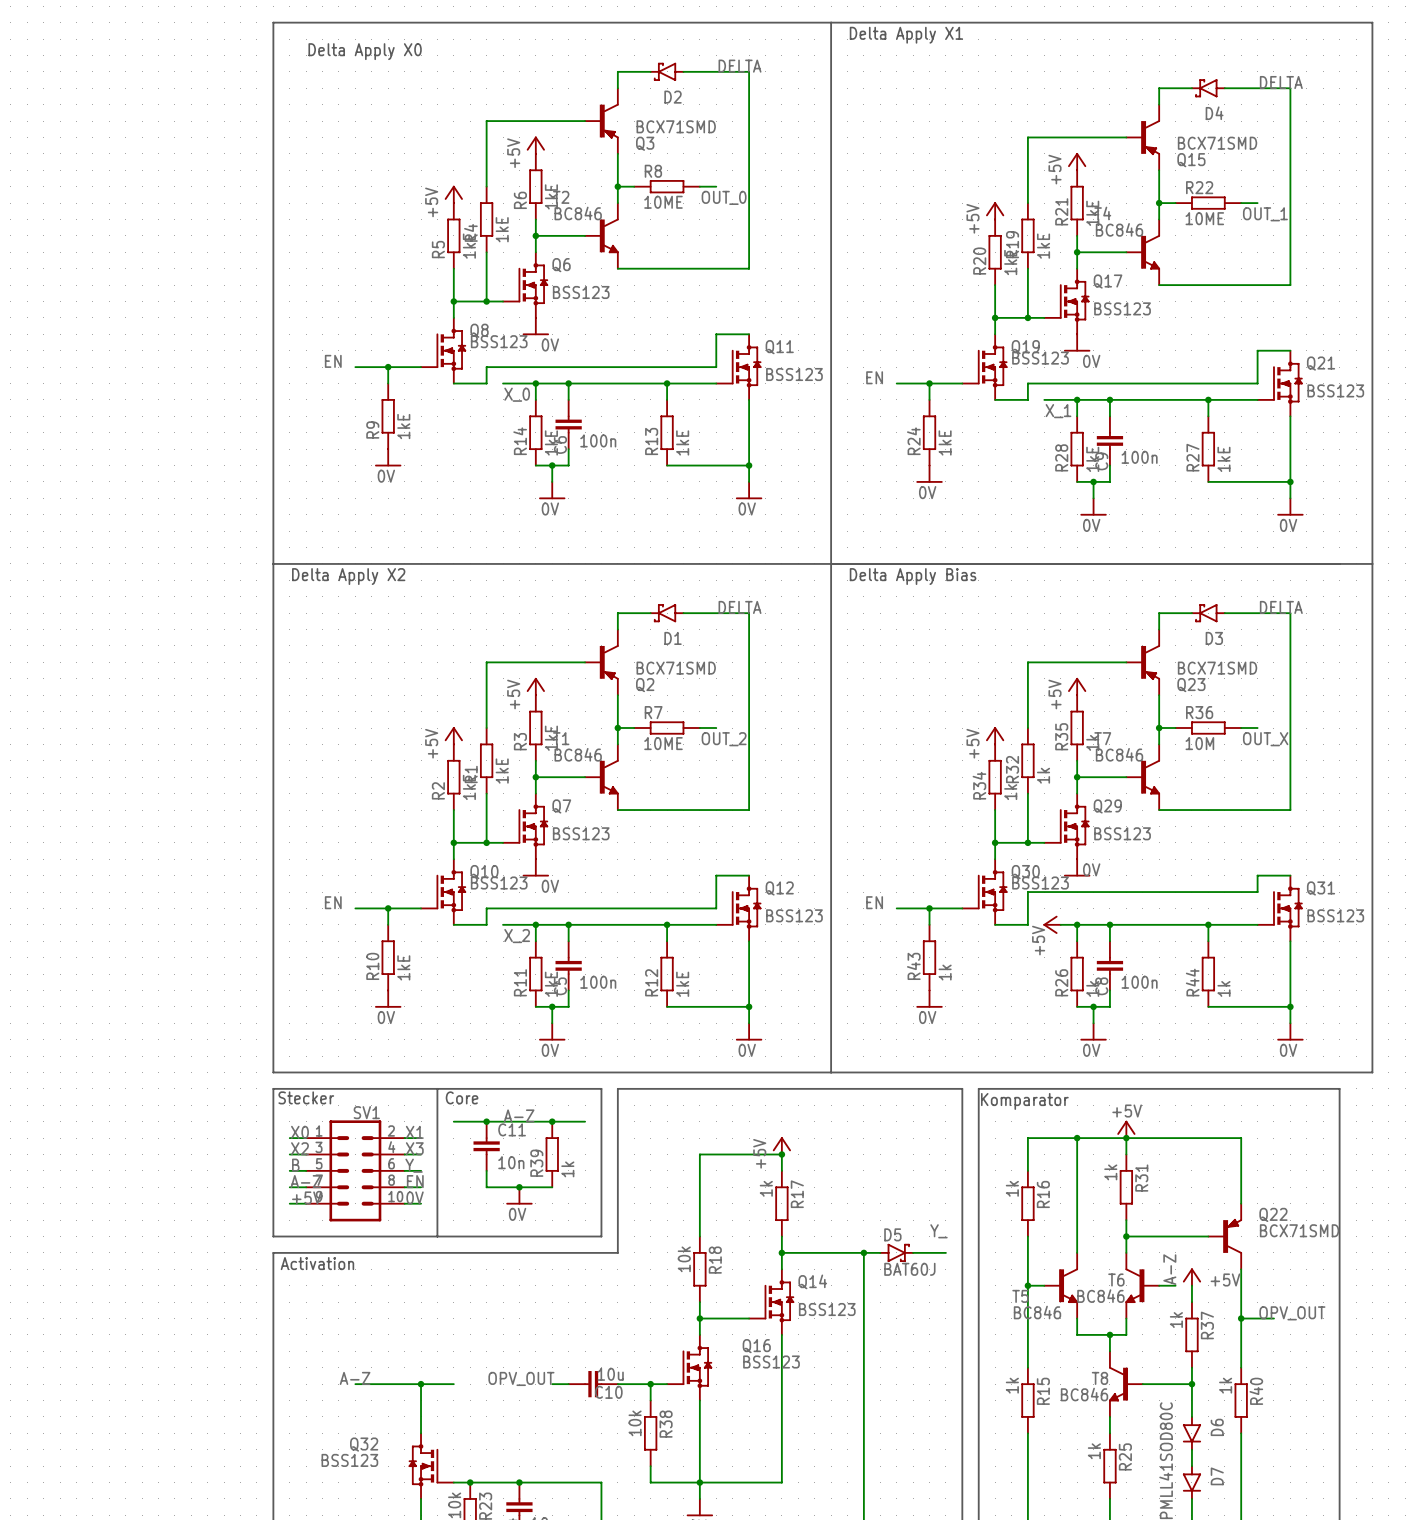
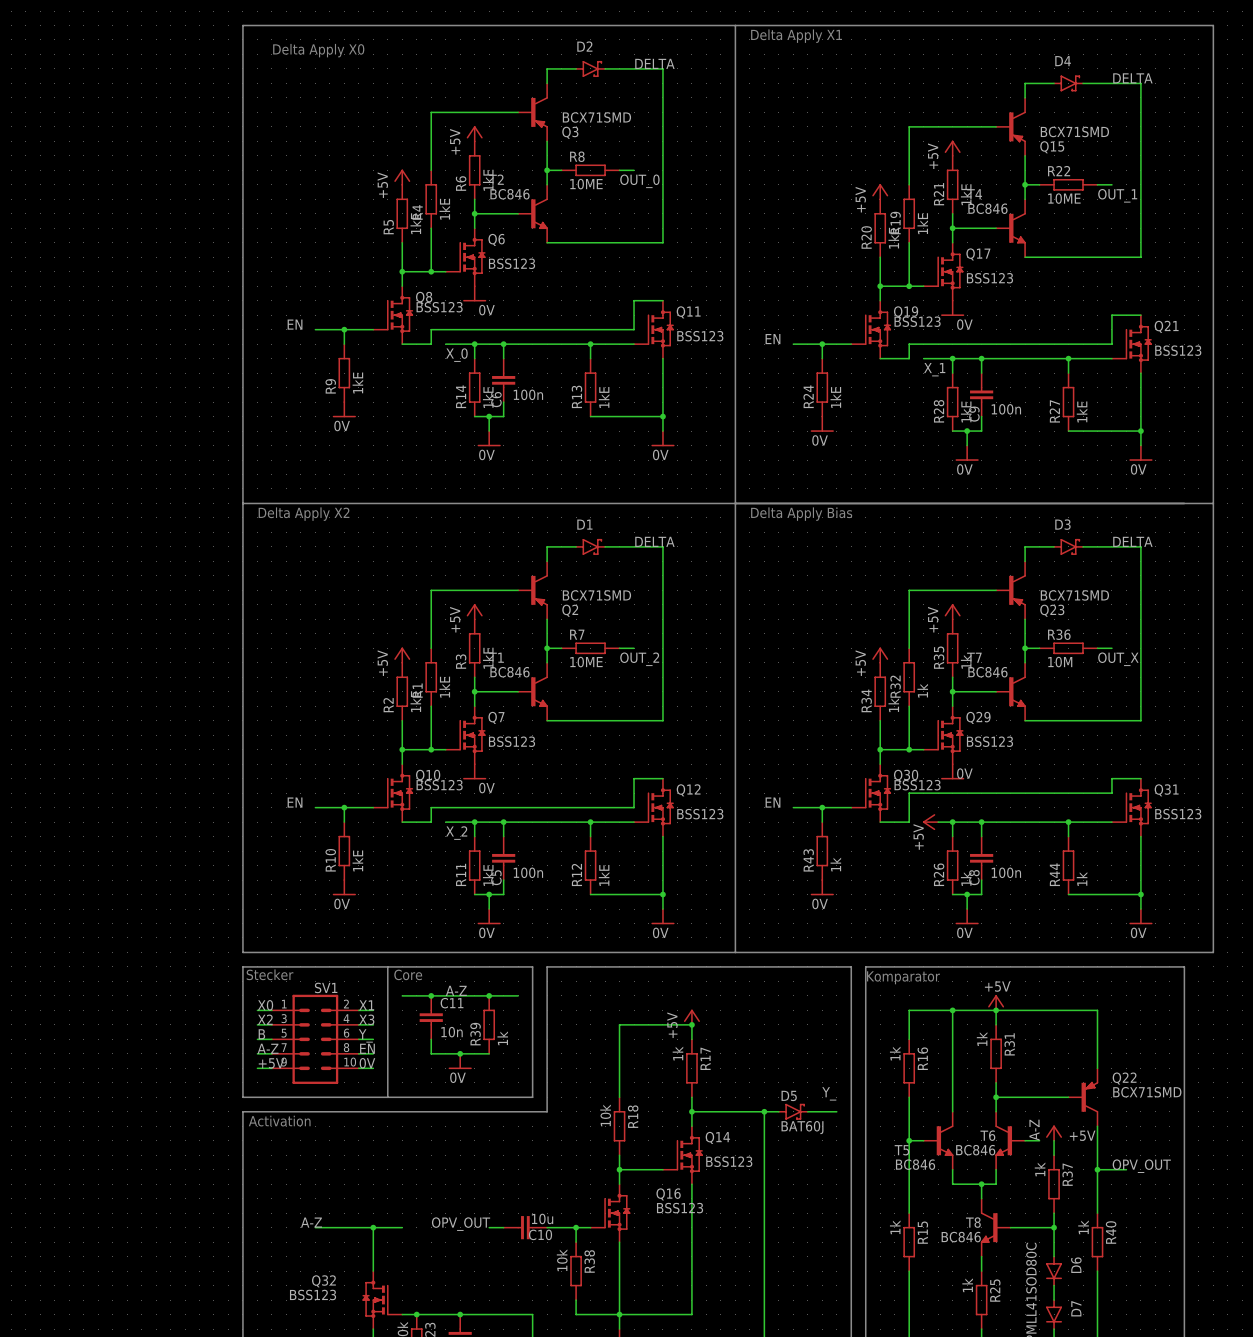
D2 rotation: 0° (667, 71) -> 180° (590, 68)
D4 rotation: 0° (1208, 88) -> 180° (1068, 83)
D1 rotation: 0° (667, 613) -> 180° (590, 546)
D3 rotation: 0° (1208, 613) -> 180° (1068, 546)

